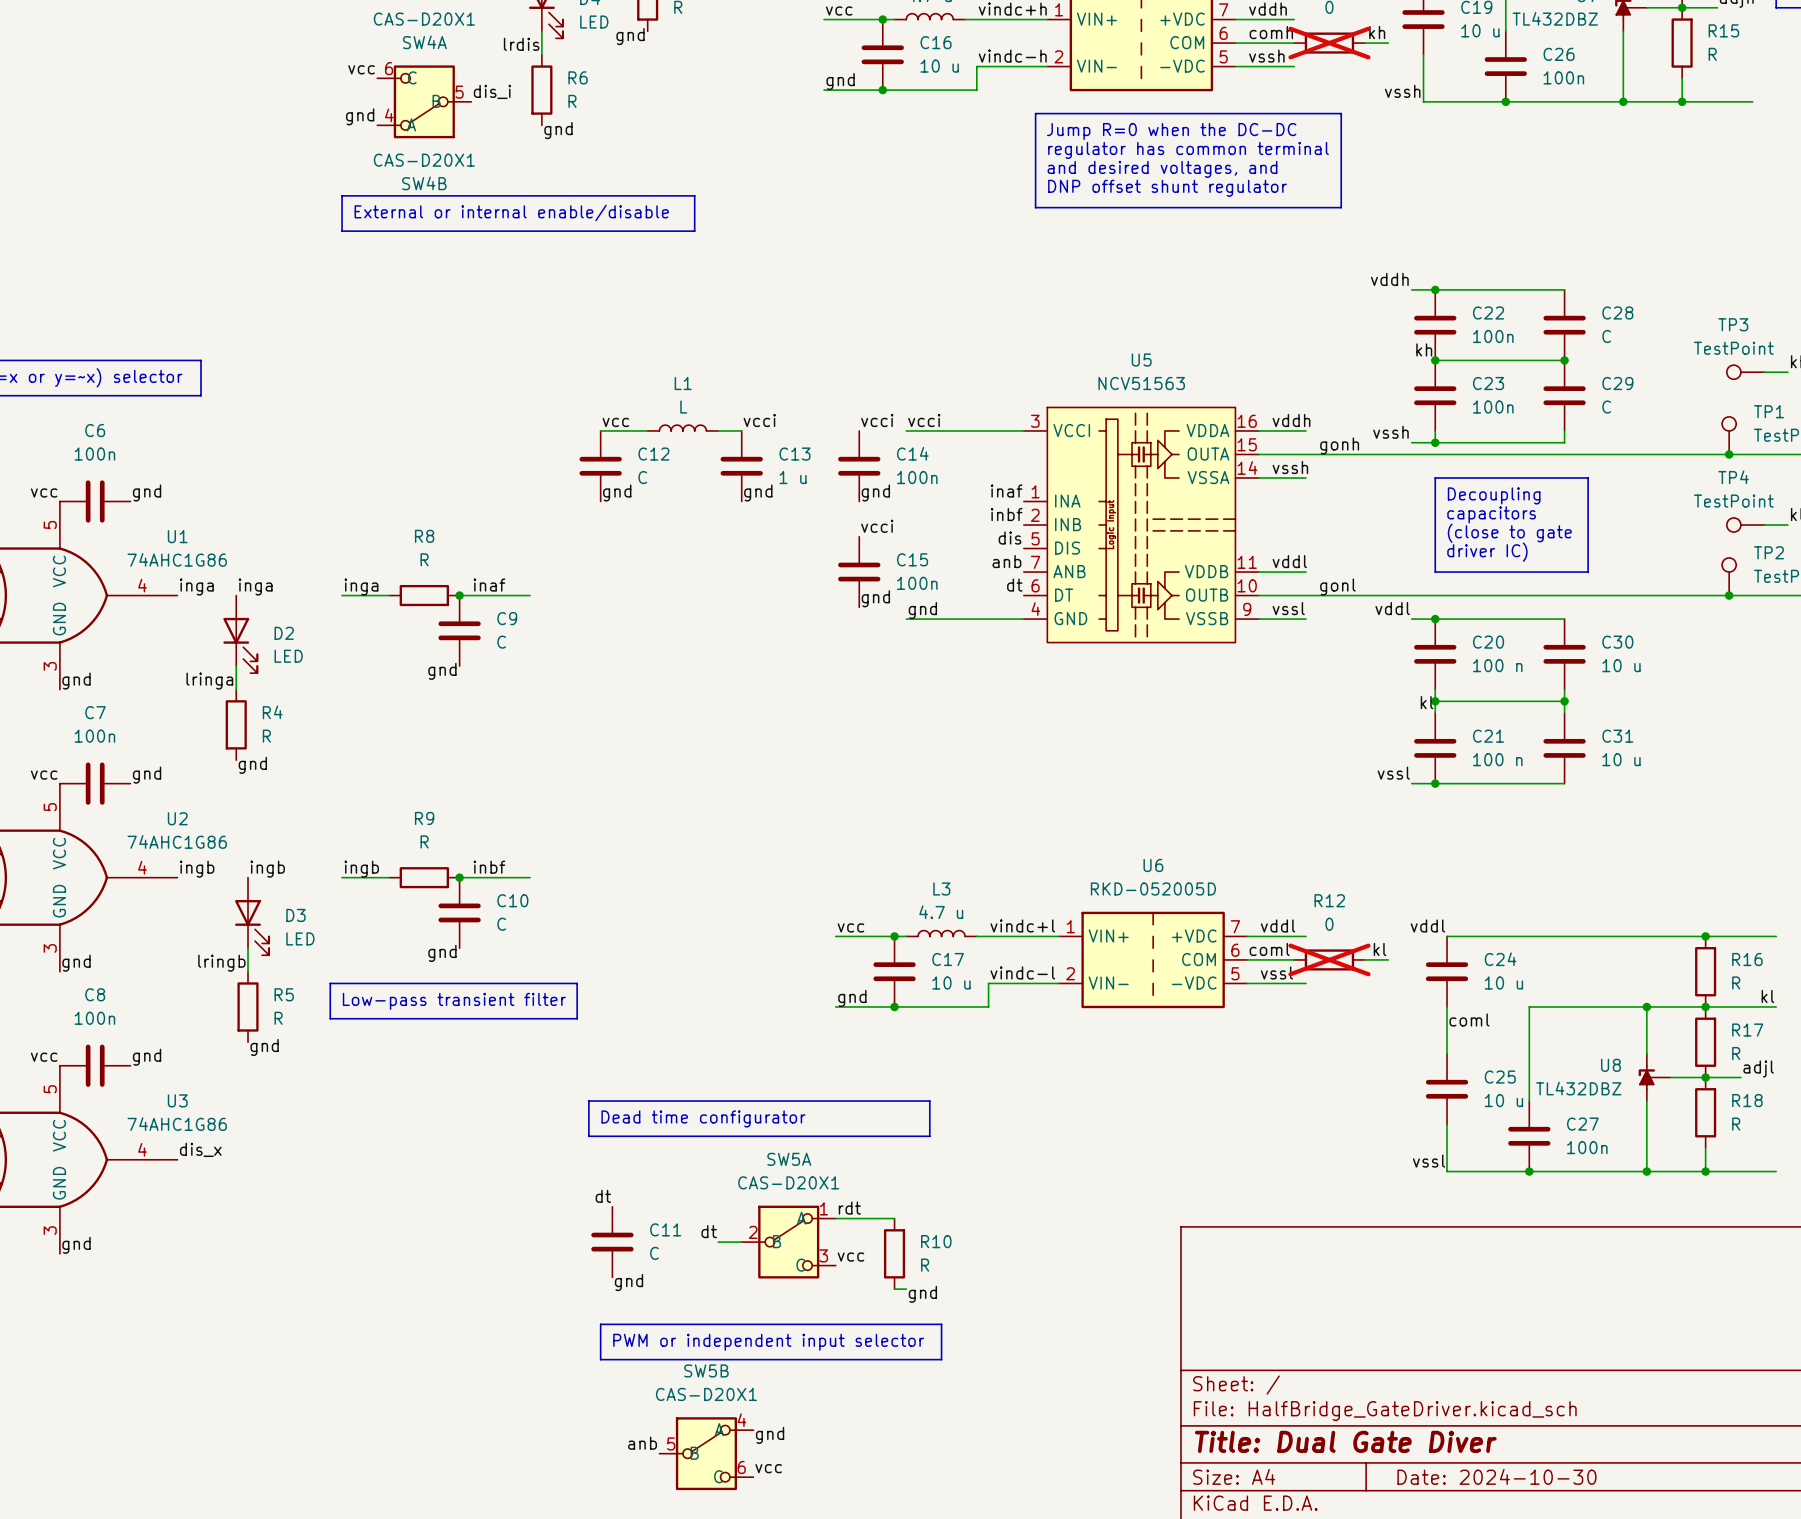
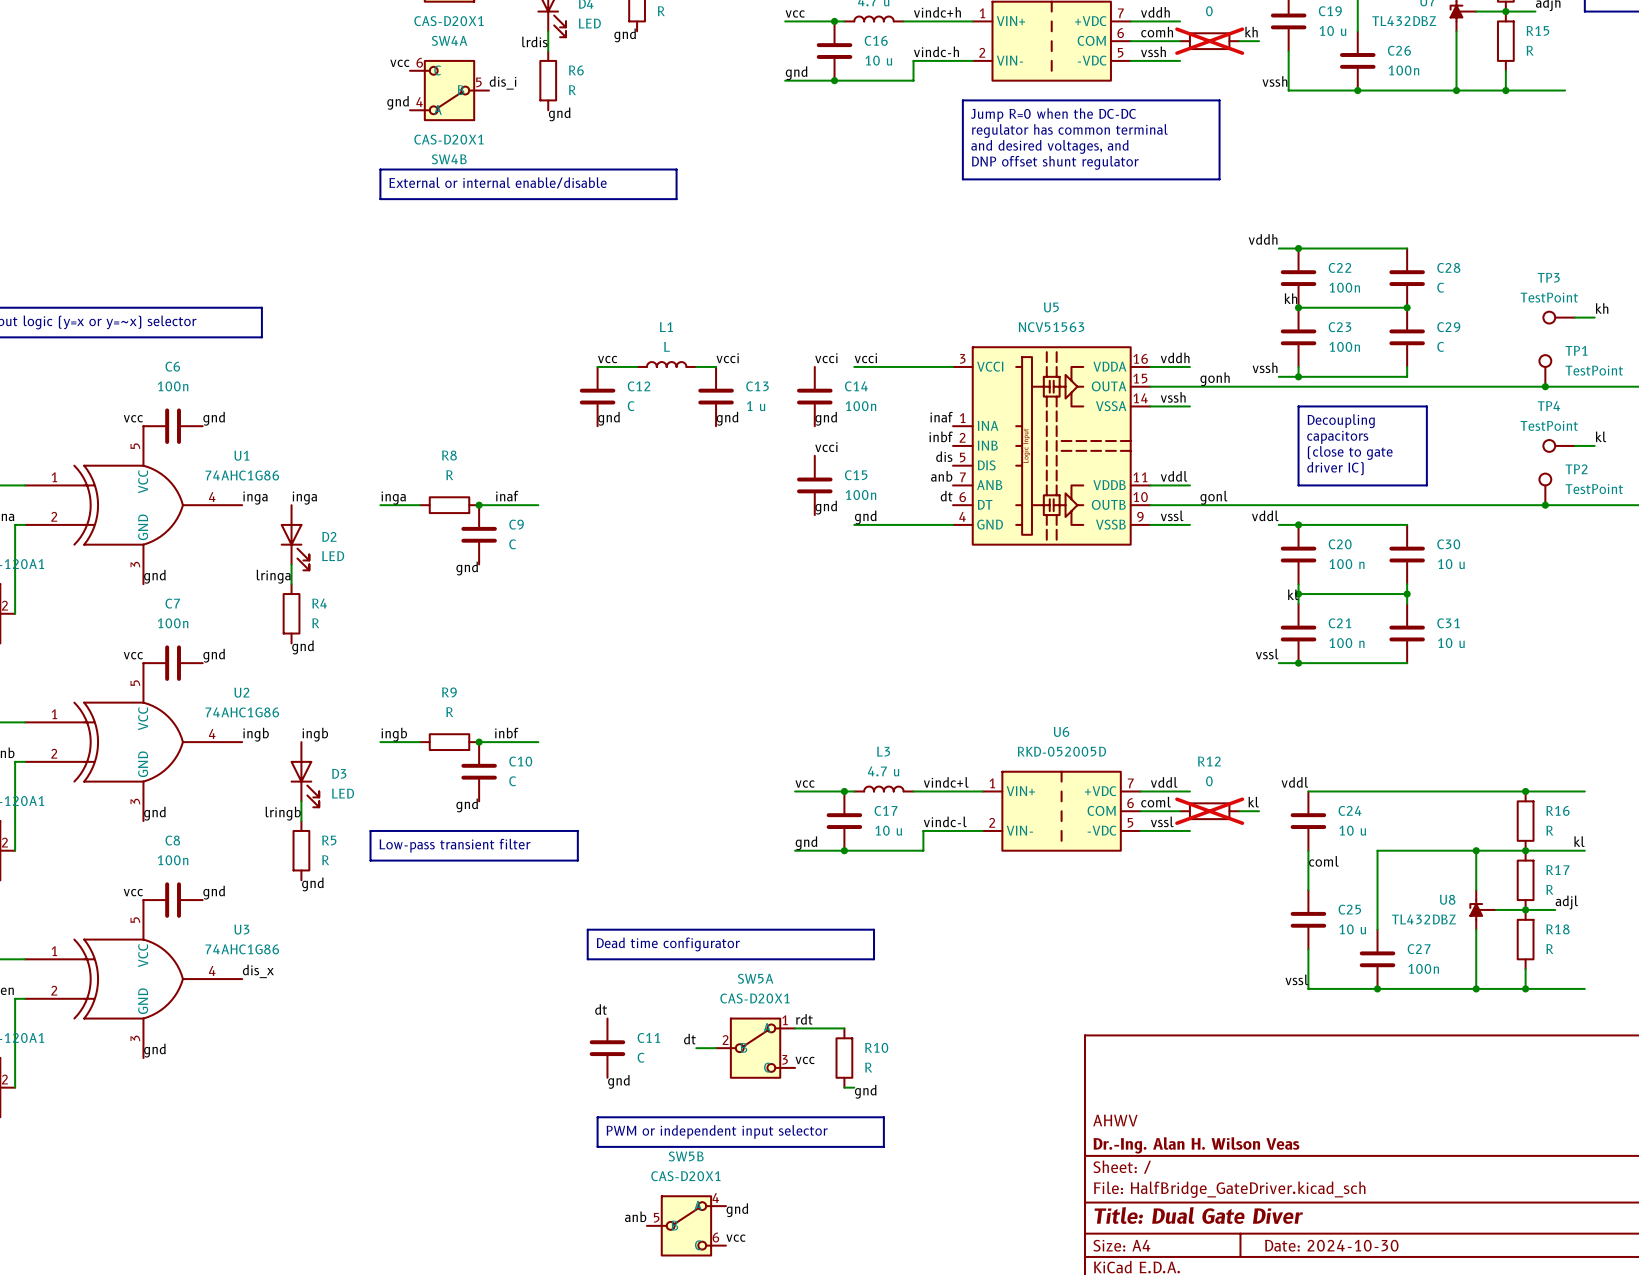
title block: none -> AHWV (1115, 1120)
title block: none -> Dr.-Ing. Alan H. Wilson Veas (1196, 1145)

